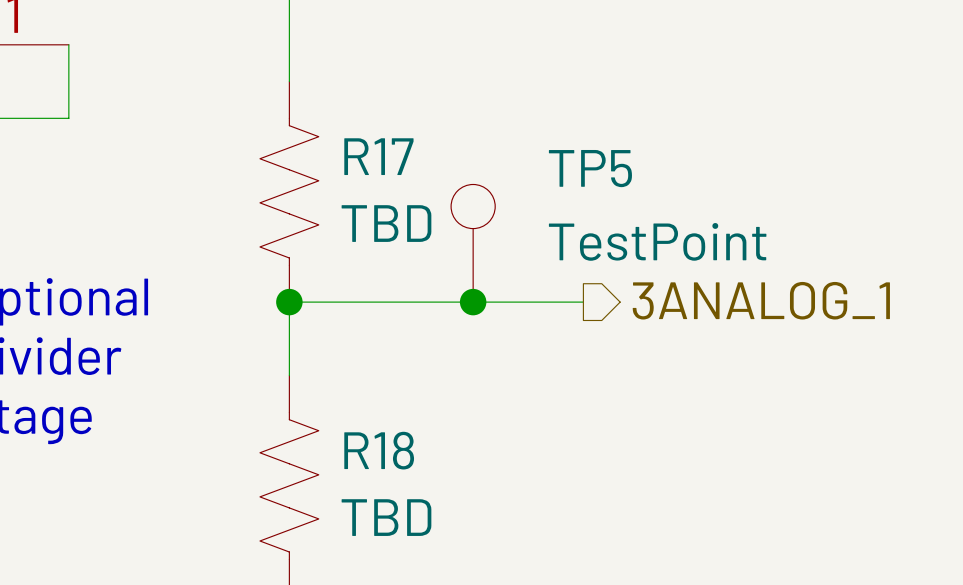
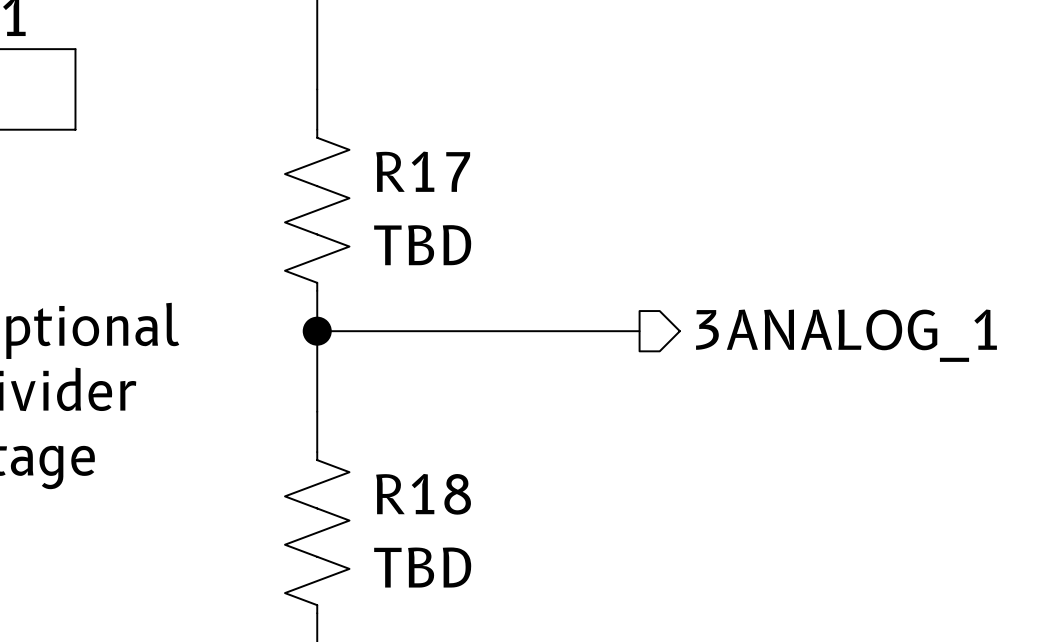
TP5: TestPoint (473, 243) -> none
junction: (473, 302) -> none

